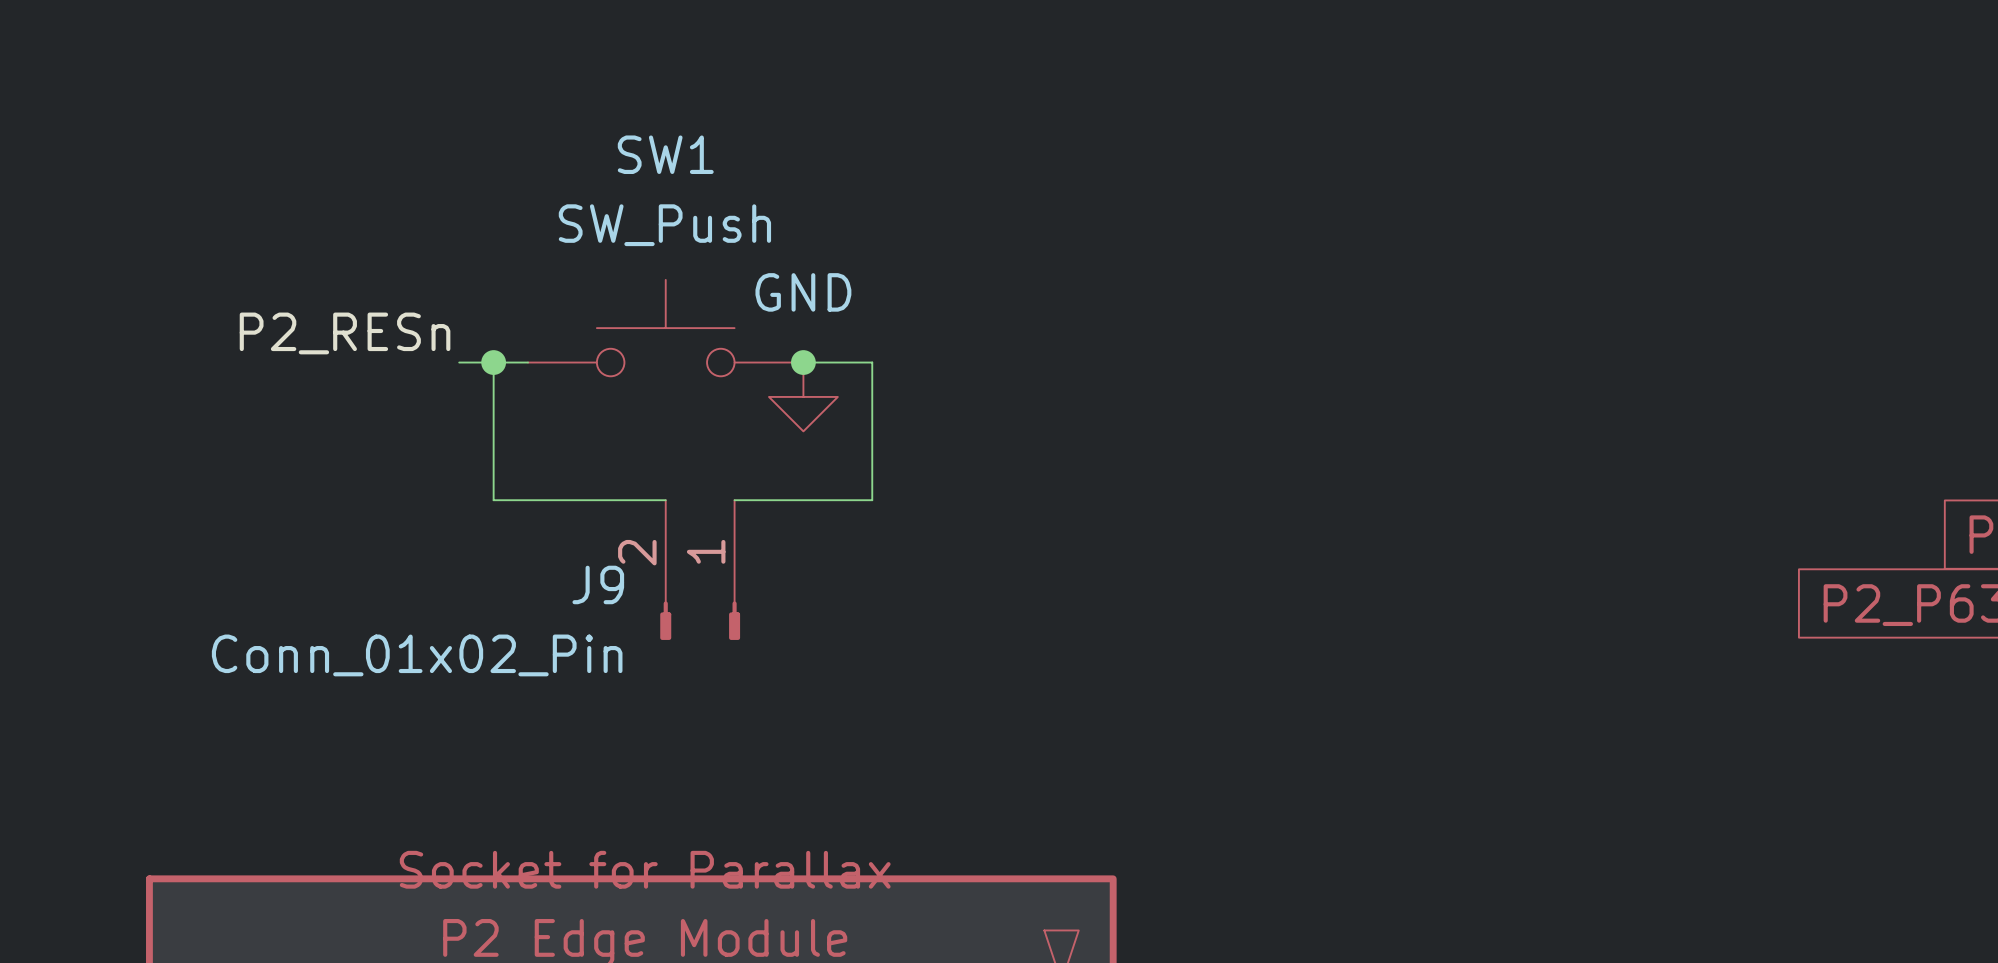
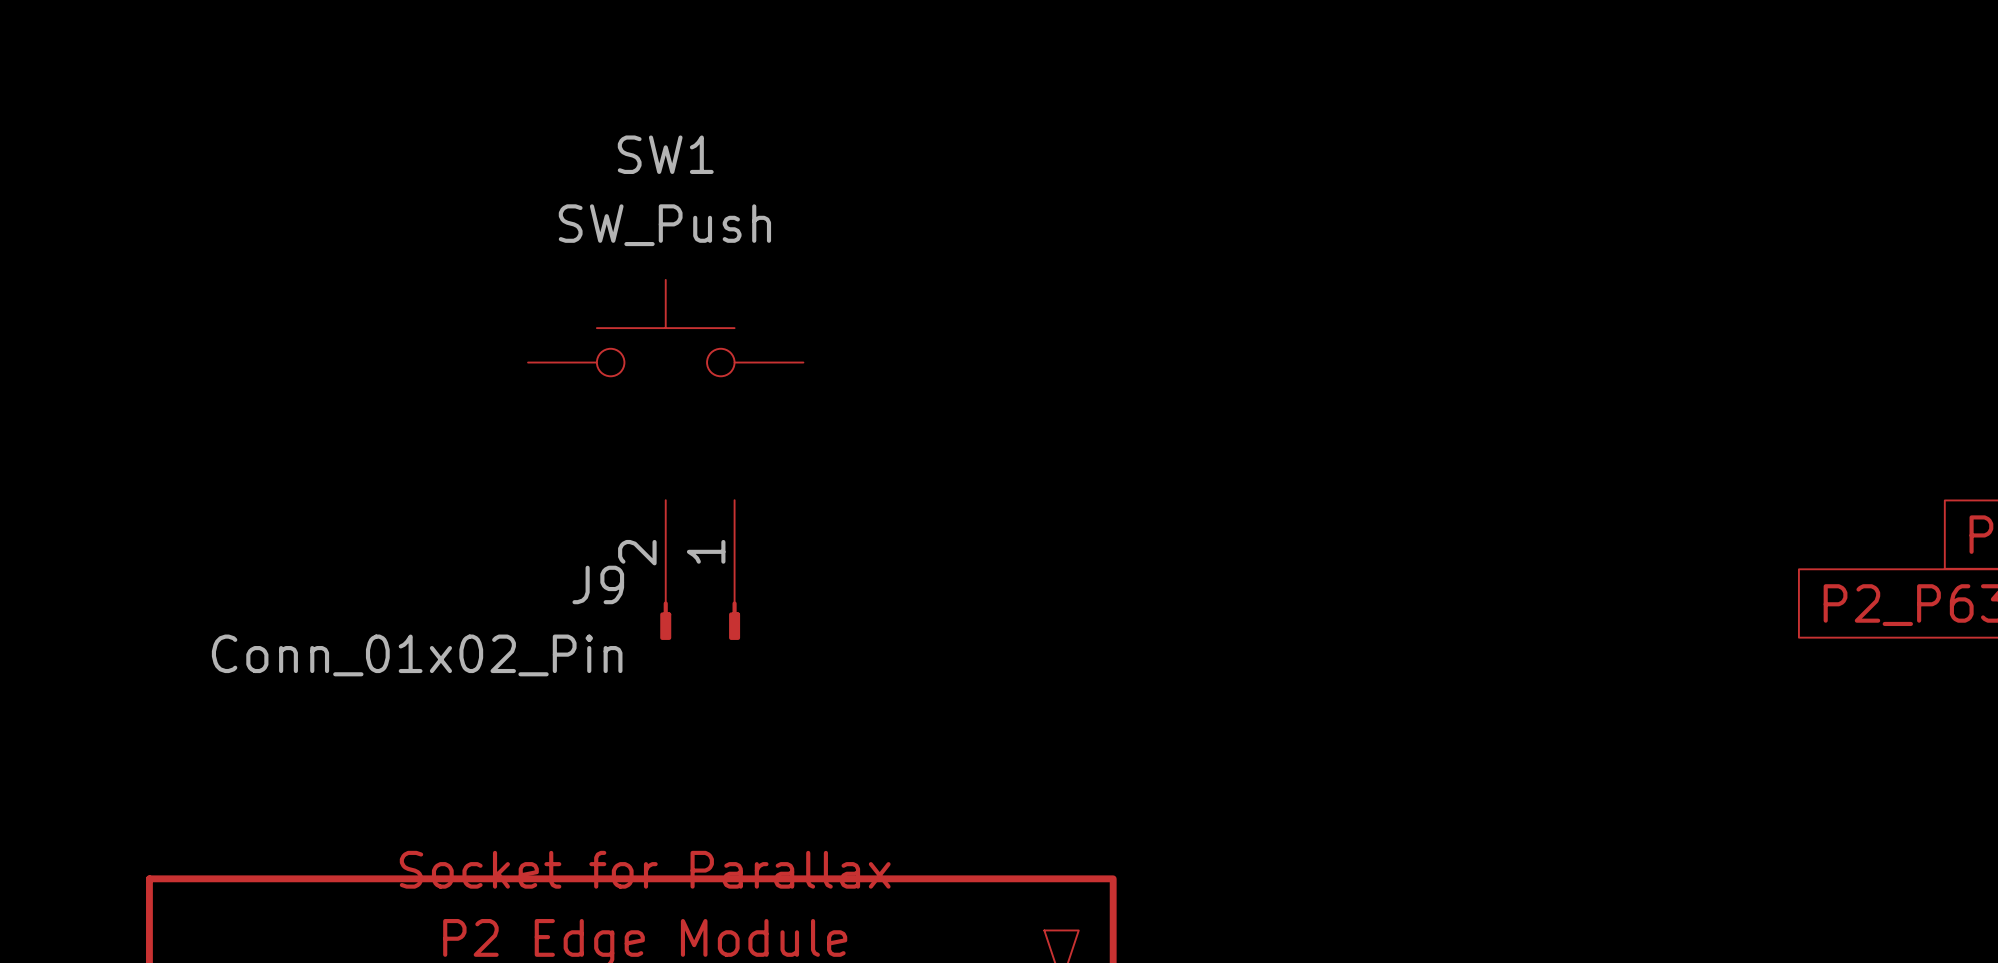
label: P2_RESn (345, 333) -> none
wire: (459, 362) (528, 362) -> none
wire: (493, 362) (493, 500) (665, 500) -> none
junction: (493, 362) -> none
wire: (803, 362) (872, 362) (872, 500) (734, 500) -> none
junction: (803, 362) -> none
power symbol: GND (803, 396) -> none

